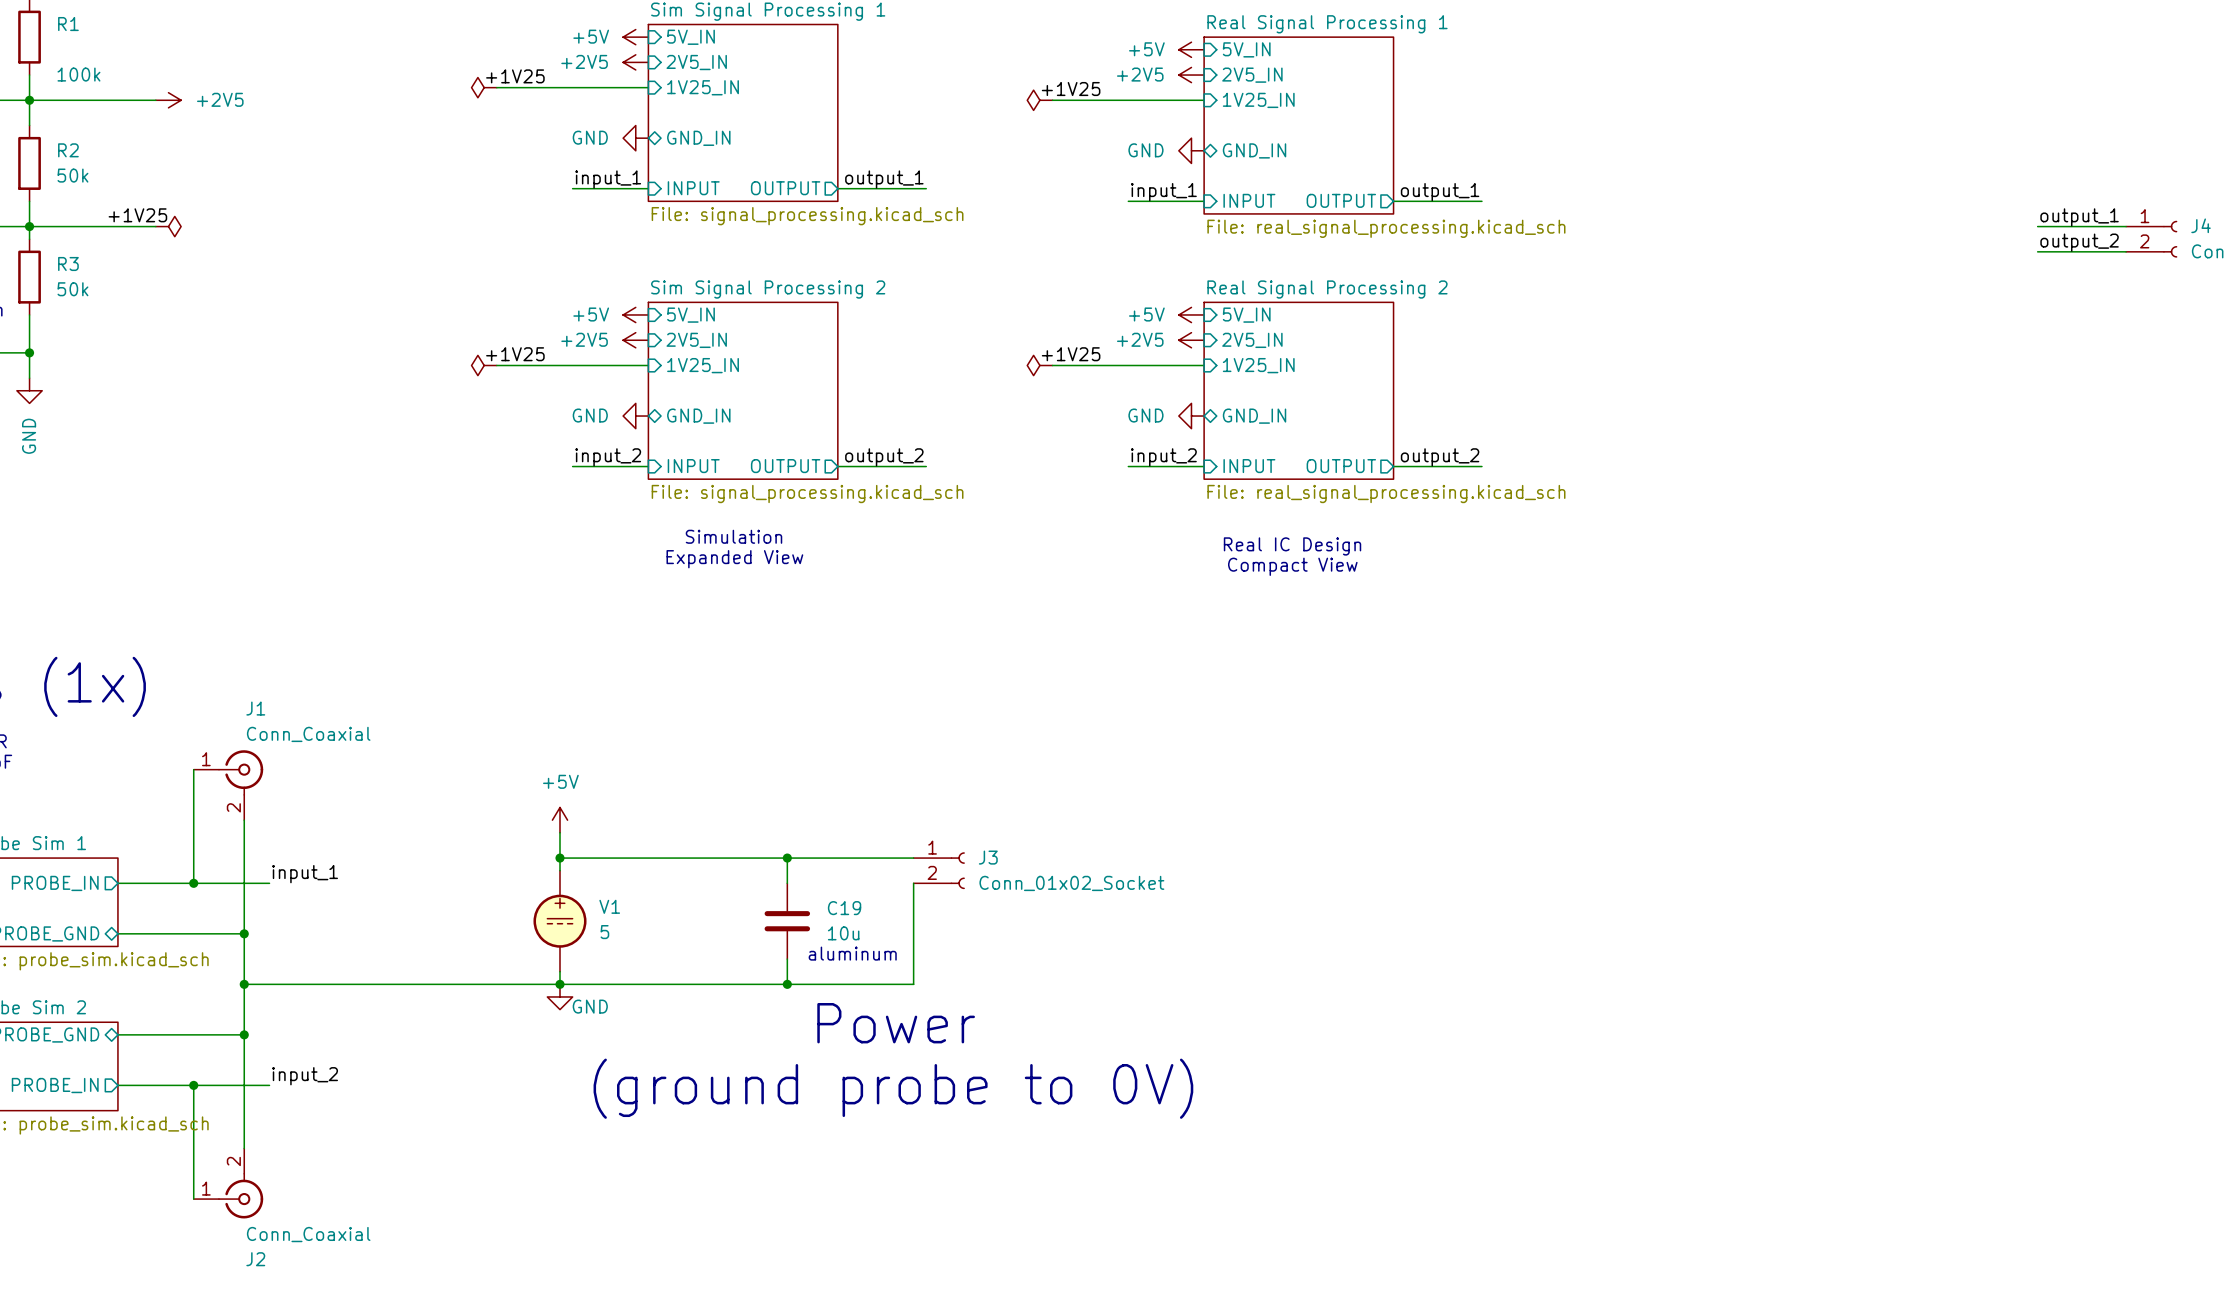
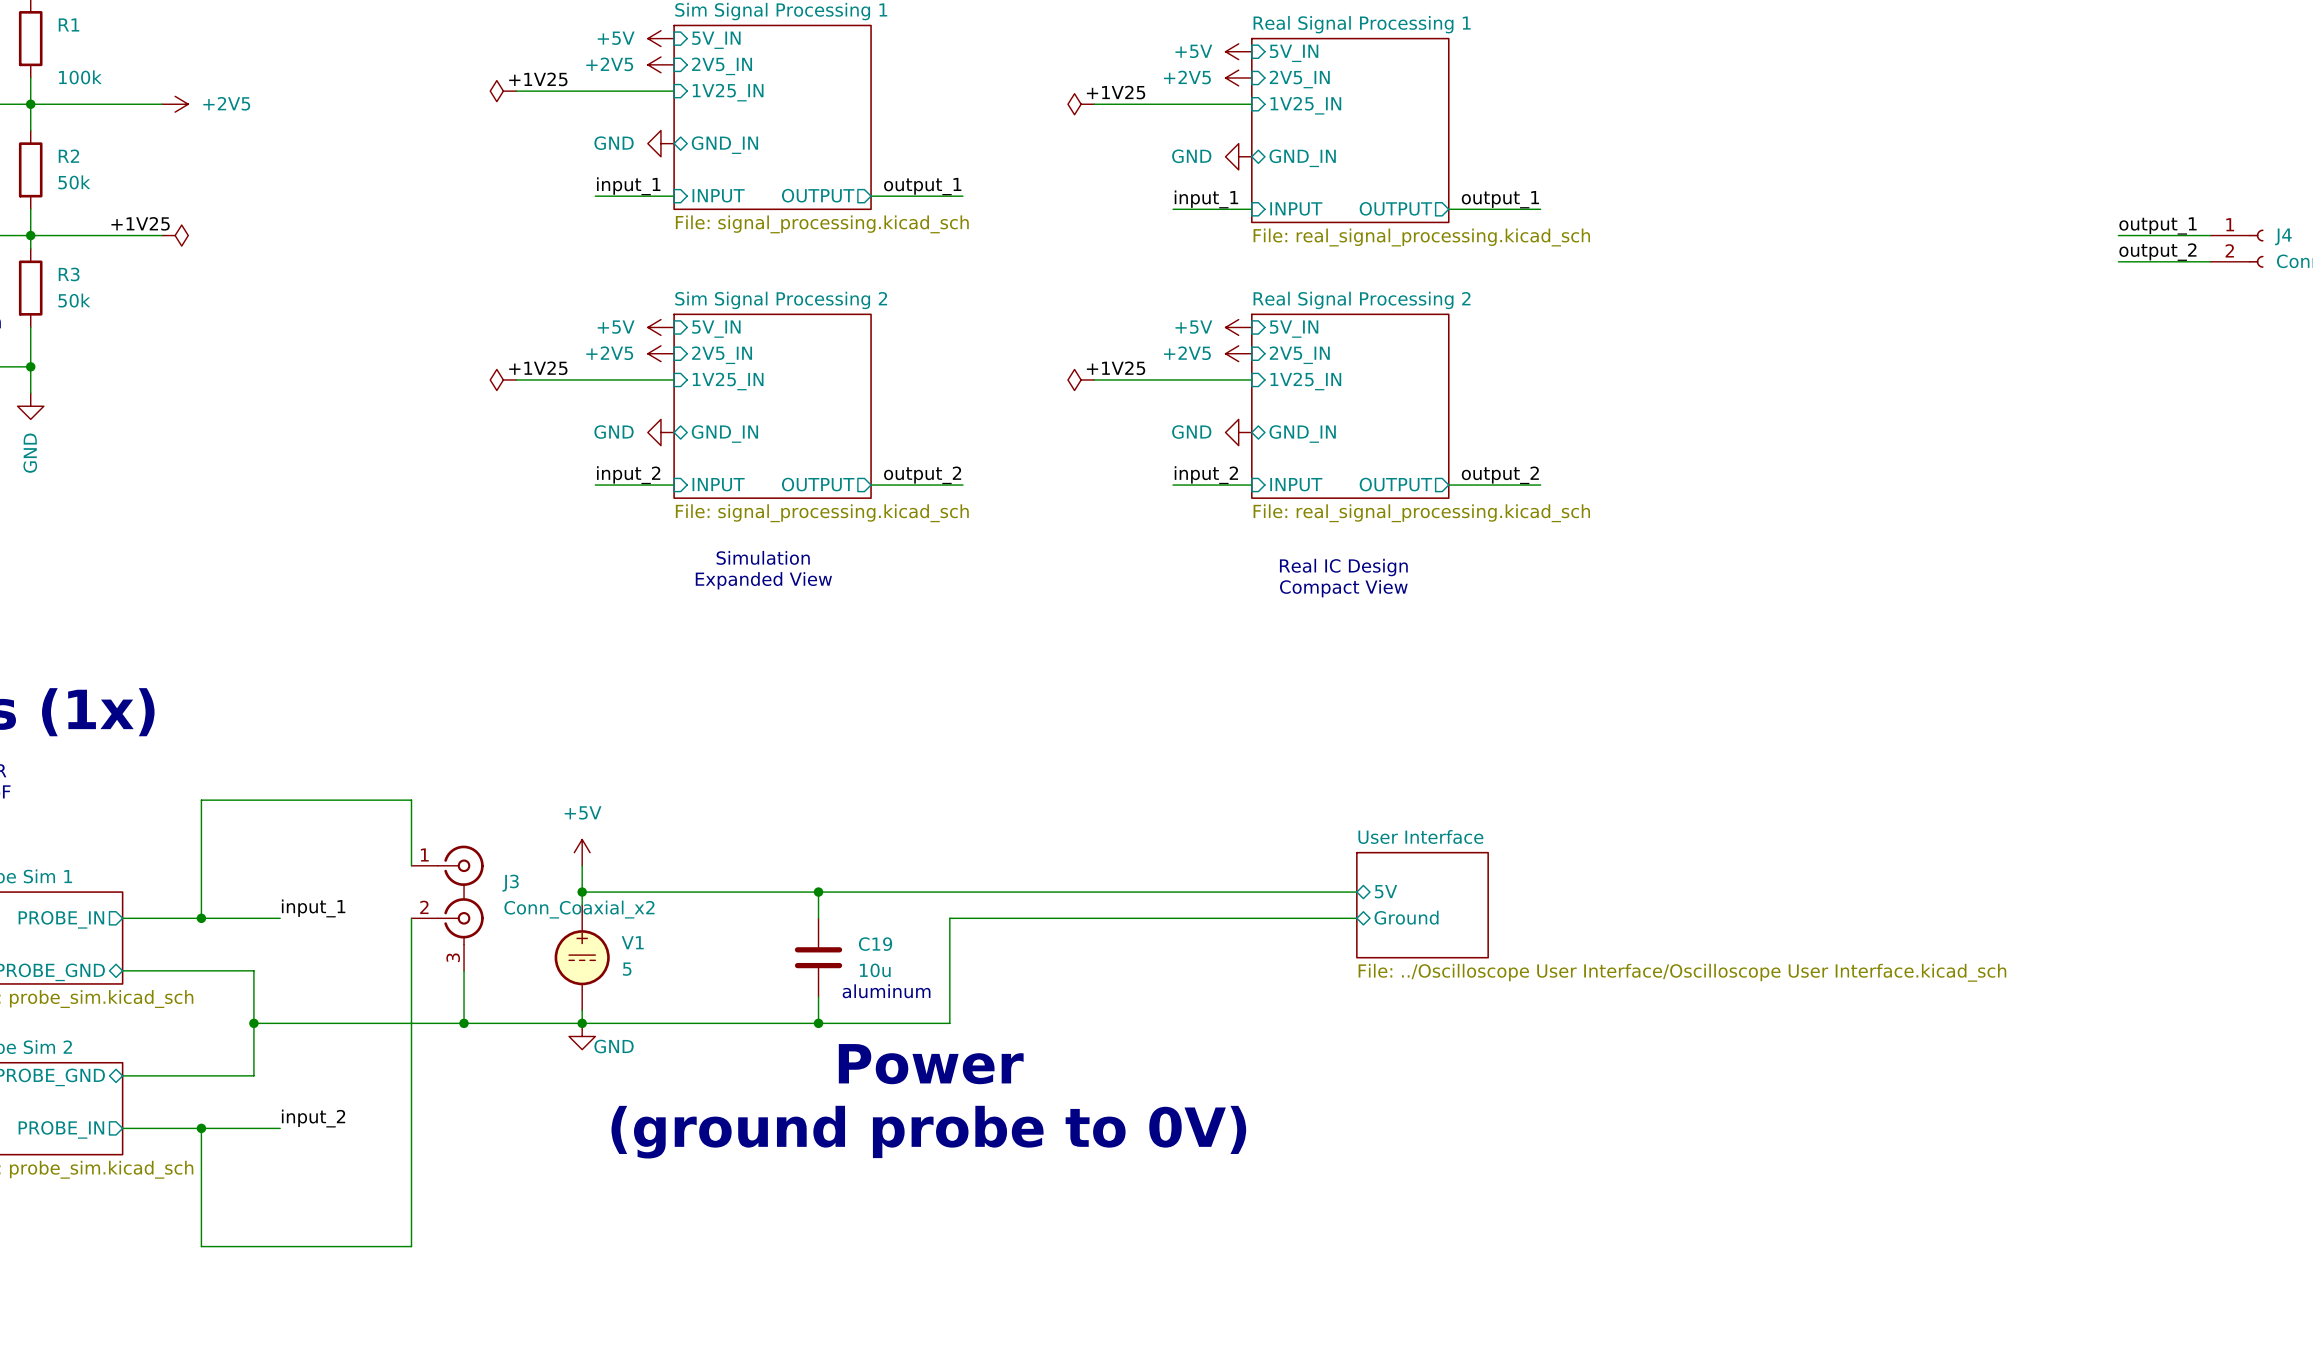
wire: none -> (201, 800) (411, 800) (411, 865)
J1: Conn_Coaxial (228, 785) -> none
wire: (244, 820) (244, 933) -> none
J3 symbol: [913, 852, 965, 890] -> [411, 845, 484, 971]
J3 name position: J3 (988, 857) -> J3 (510, 883)
sheet pin: none -> 5V (1386, 891)
wire: none -> (949, 892) (1356, 892)
sheet User Interface: none -> File: ../Oscilloscope User Interface/Oscilloscope User Interface.kicad_sch (1422, 905)
sheet pin: none -> Ground (1406, 917)
wire: none -> (411, 918) (411, 1246) (201, 1246)
wire: none -> (949, 918) (1356, 918)
J3 value: Conn_01x02_Socket (1071, 883) -> Conn_Coaxial_x2 (579, 909)
junction: (244, 933) -> none
wire: none -> (464, 970) (464, 1023)
junction: none -> (464, 1023)
wire: (244, 1034) (244, 1148) -> none
junction: (244, 1034) -> none
J2: Conn_Coaxial (228, 1183) -> none

